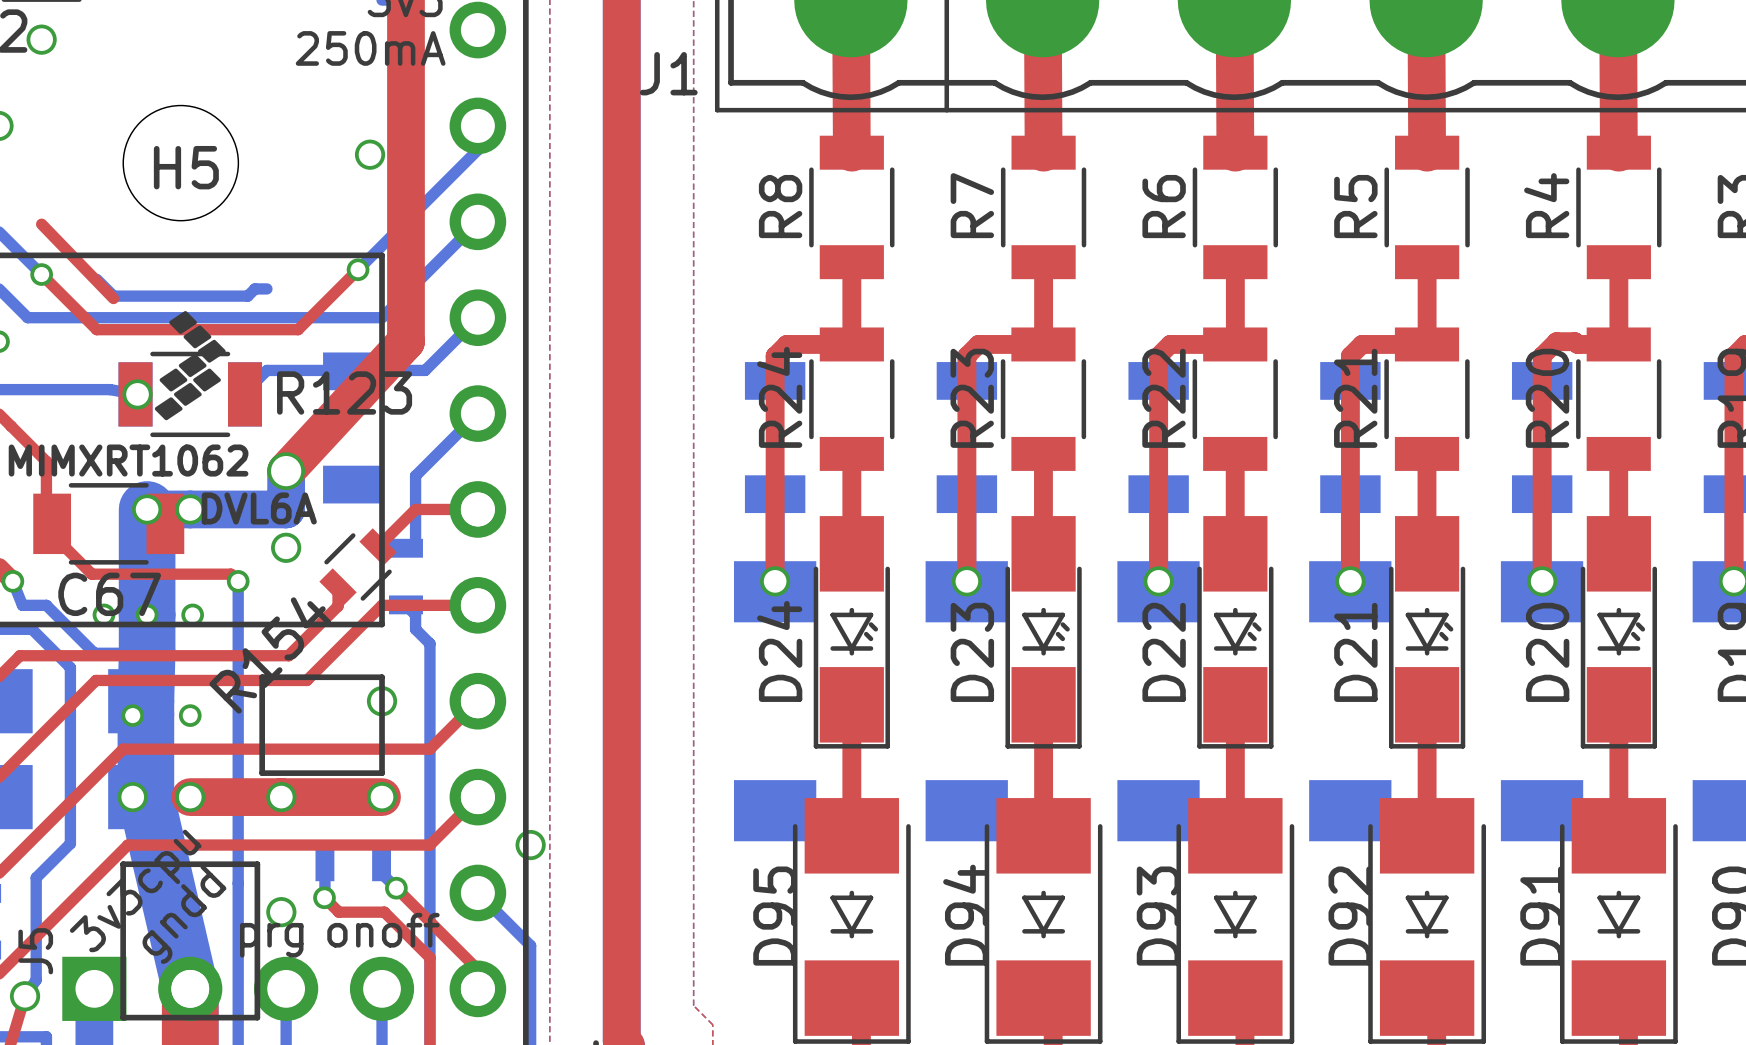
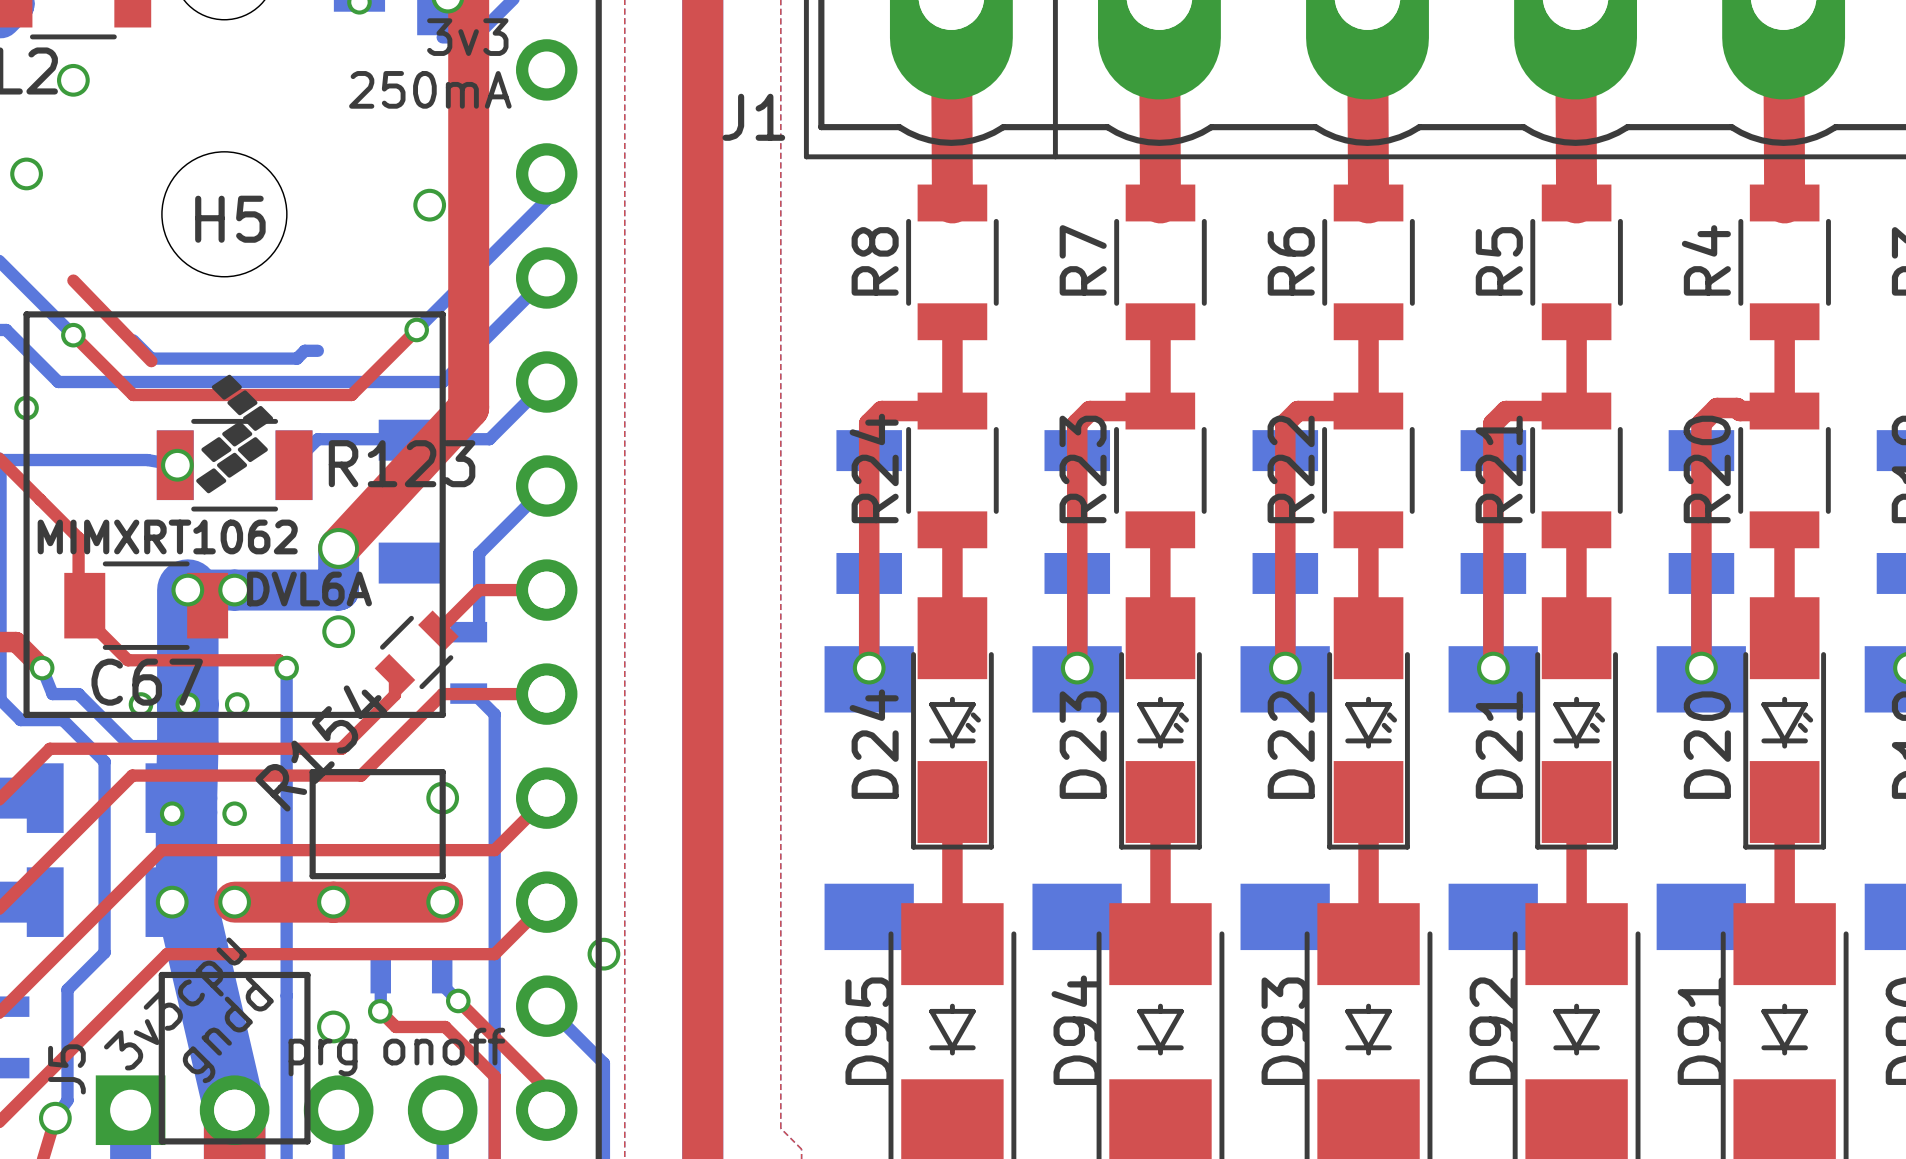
bottom track: (405, 605) (415, 614) (415, 629) (429, 643) -> (473, 693) (494, 714) (494, 735)

